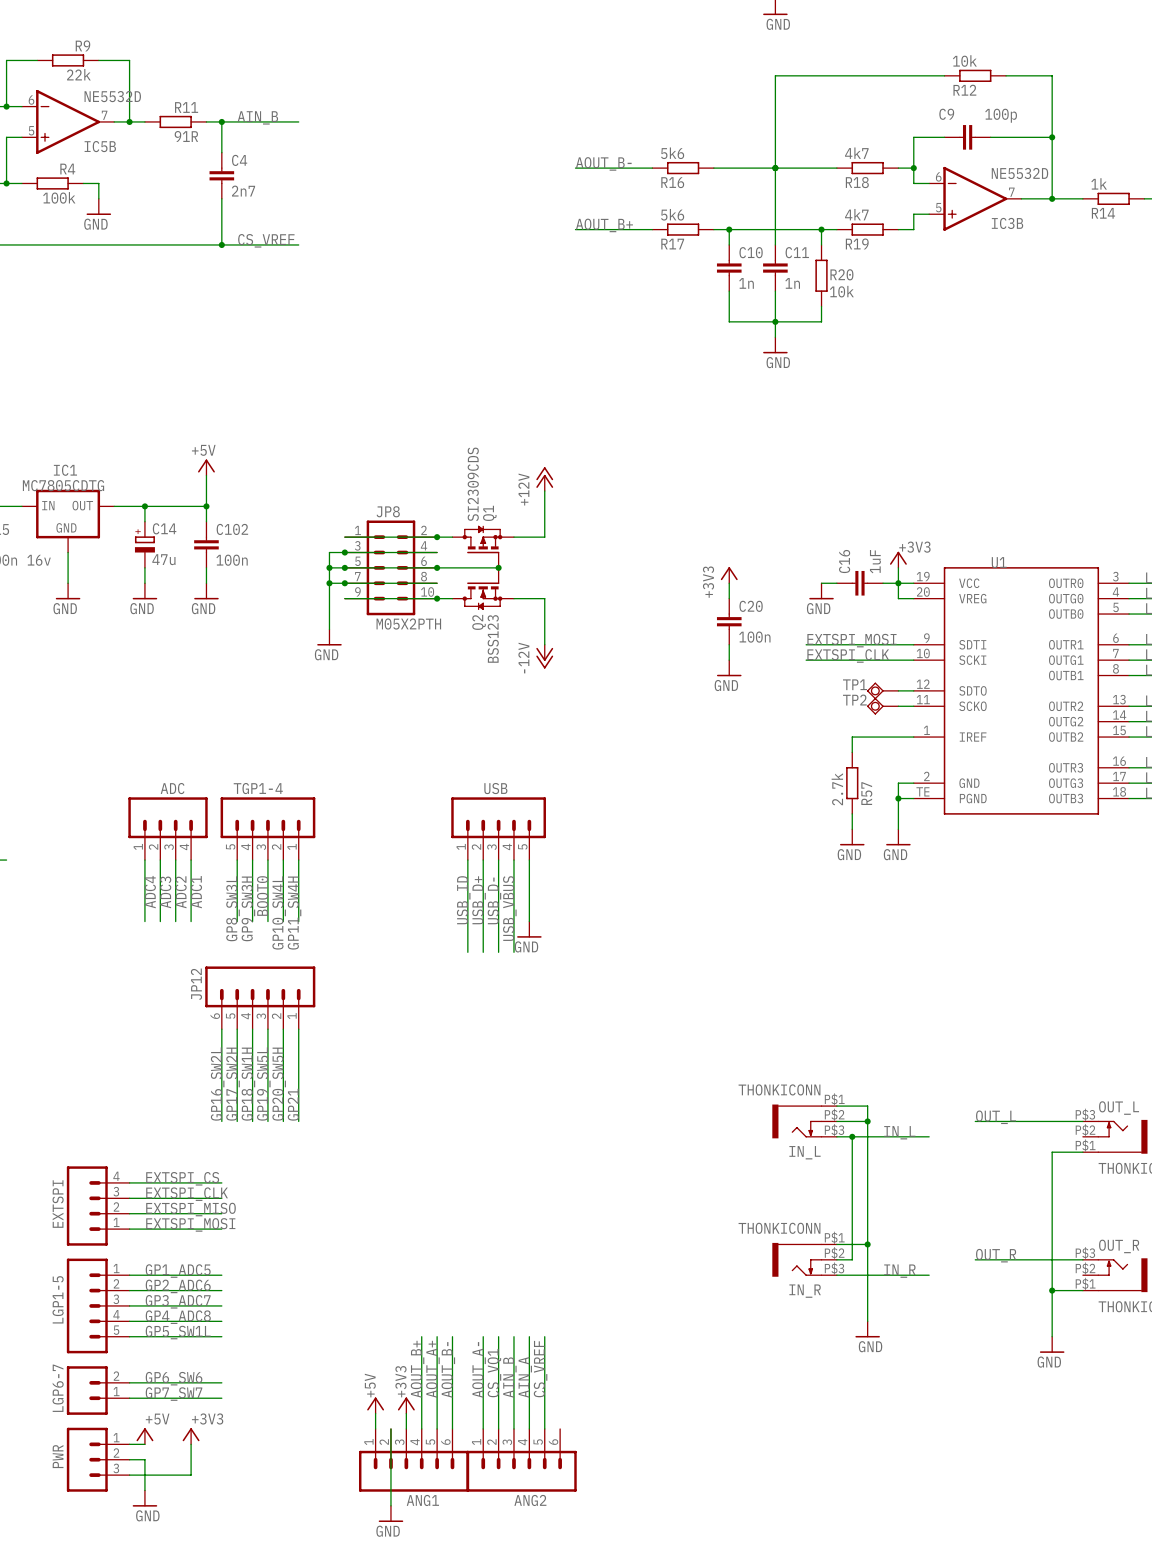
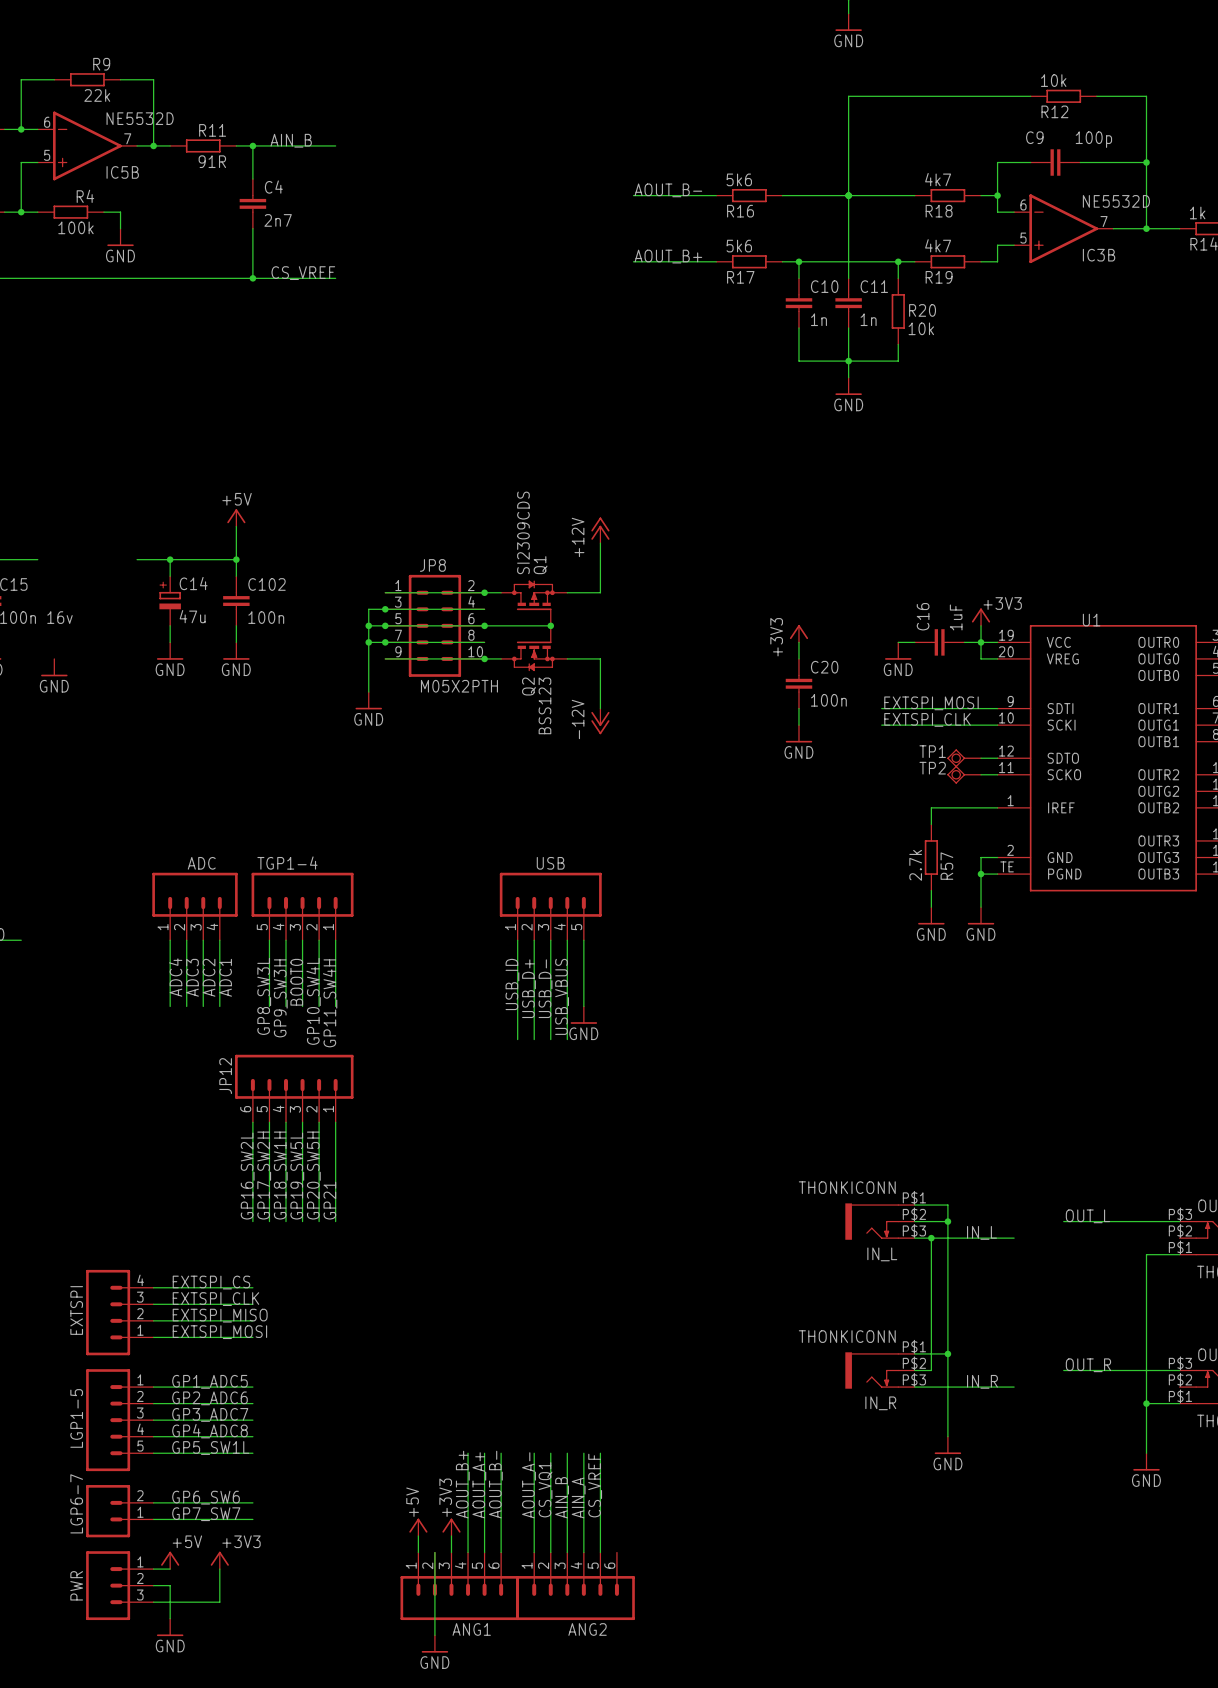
IC1: MC7805CDTG (68, 521) -> none
wire: (68, 552) (68, 583) -> none
power symbol position: GND (68, 591) -> GND (54, 667)

